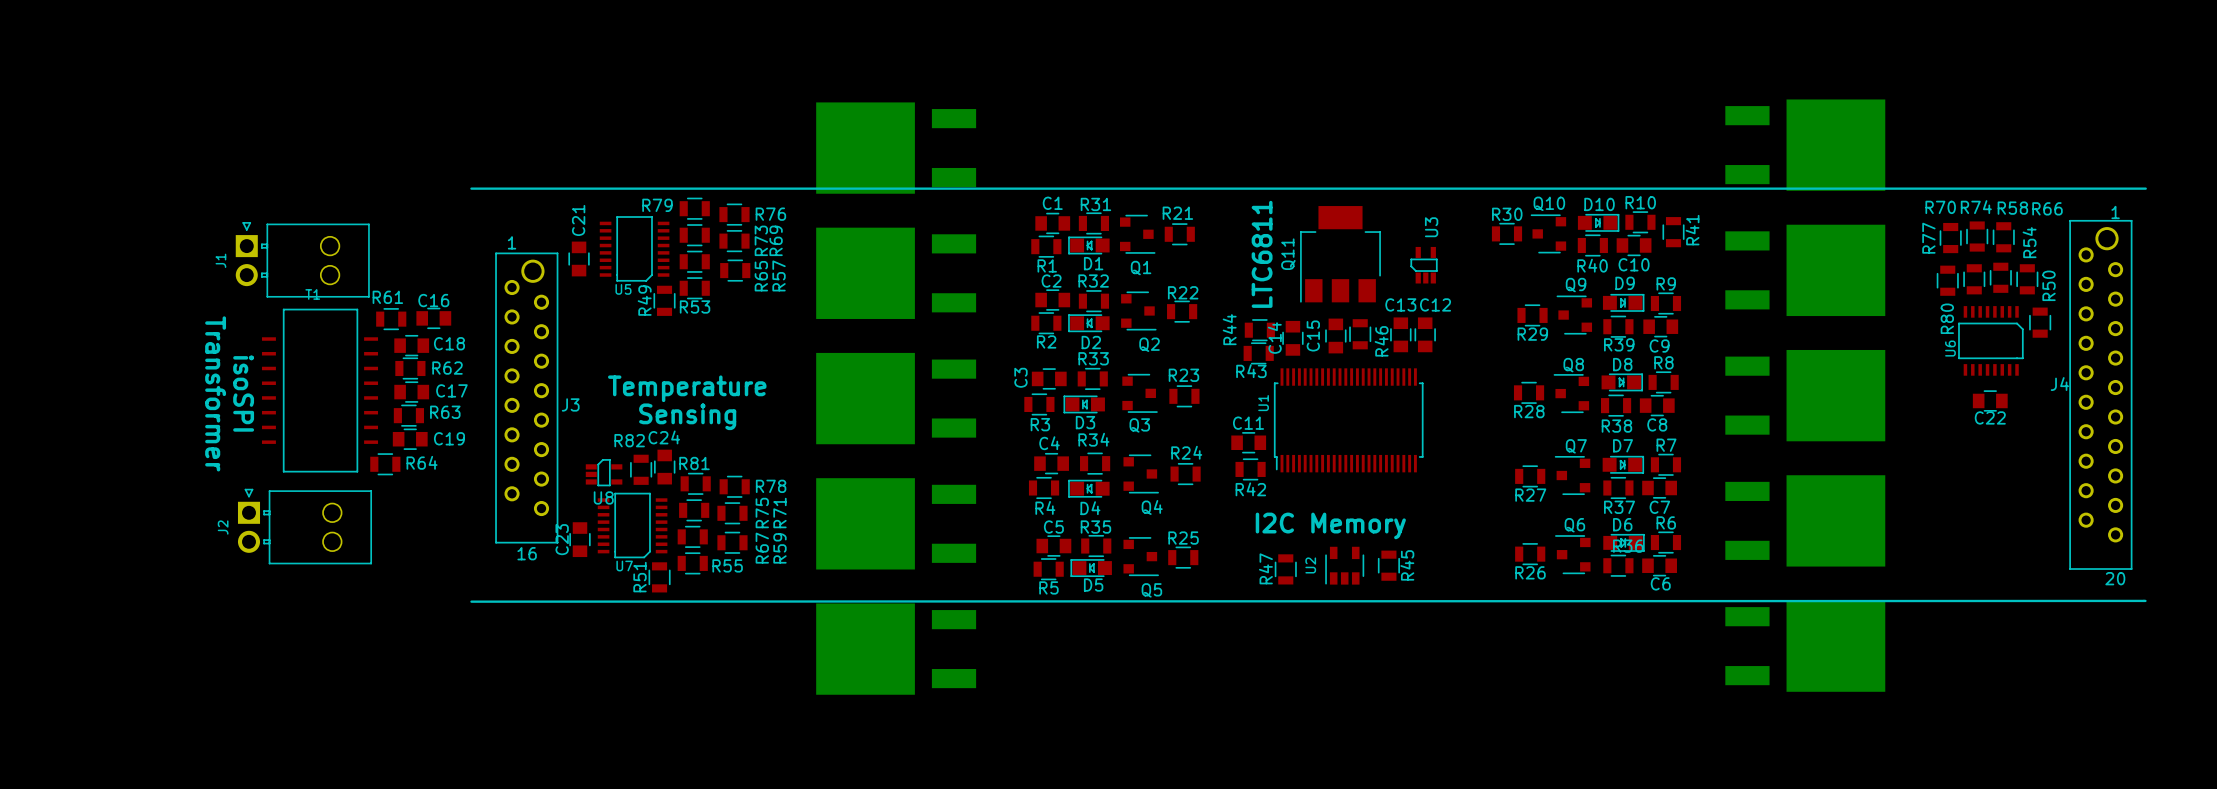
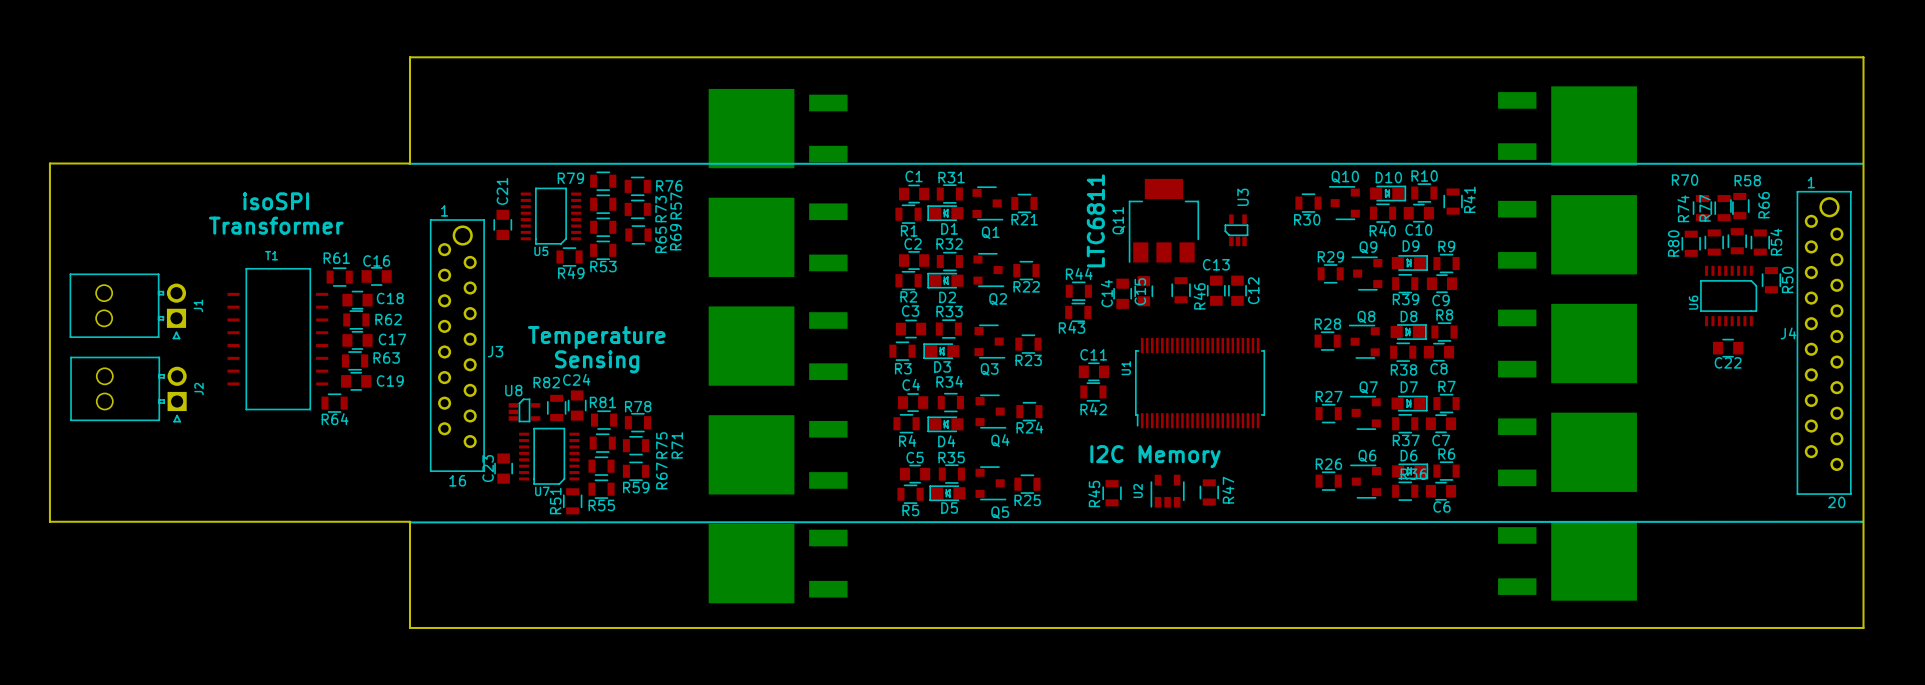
board edge: none -> (409, 57) (1863, 57) (1863, 627) (409, 627) (409, 521) (49, 521) (49, 163) (409, 163) (409, 57)
R74 name rotation: 0° (1976, 207) -> 90° counterclockwise (1683, 208)
R74 name position: R74 (1976, 207) -> R74 (1683, 208)
R66 name rotation: 0° (2047, 208) -> 90° counterclockwise (1764, 205)
J4 text position: 1 (2115, 212) -> 1 (1811, 182)
R21 name position: R21 (1177, 213) -> R21 (1024, 219)
R30 name position: R30 (1507, 214) -> R30 (1307, 219)
R70 position: (1977, 236) -> (1702, 208)
R77 position: (1950, 238) -> (1724, 208)
R69 name: R69 (776, 240) -> R57 (676, 205)
R54 name position: R54 (2029, 242) -> R54 (1776, 242)
J1 rotation: 0° (302, 259) -> 180° (127, 306)
J1 position: (302, 259) -> (127, 306)
R57 name: R57 (779, 275) -> R69 (675, 237)
R50 name position: R50 (2049, 285) -> R50 (1787, 279)
R22 name position: R22 (1183, 292) -> R22 (1026, 286)
R49 name position: R49 (644, 300) -> R49 (571, 272)
R49 rotation: 0° (664, 300) -> 90° clockwise (569, 256)
C12 name rotation: 0° (1435, 304) -> 90° counterclockwise (1253, 290)
R80 name position: R80 (1947, 318) -> R80 (1673, 243)
R44 name rotation: 0° (1229, 329) -> 90° clockwise (1079, 273)
R44 position: (1259, 330) -> (1078, 291)
R29 name position: R29 (1532, 334) -> R29 (1330, 256)
C15 position: (1335, 335) -> (1143, 291)
R43 position: (1258, 353) -> (1078, 312)
R23 name position: R23 (1183, 375) -> R23 (1028, 360)
C3 name rotation: 0° (1020, 377) -> 90° clockwise (910, 311)
C3 name position: C3 (1020, 377) -> C3 (910, 311)
text rotation: 0° (215, 393) -> 90° counterclockwise (276, 225)
text rotation: 0° (243, 393) -> 90° counterclockwise (275, 201)
text position: isoSPI (243, 393) -> isoSPI (275, 201)
R28 name position: R28 (1529, 411) -> R28 (1327, 324)
U1 position: (1348, 420) -> (1200, 383)
C11 position: (1248, 442) -> (1093, 371)
R24 name position: R24 (1186, 452) -> R24 (1029, 427)
R64 name position: R64 (422, 462) -> R64 (335, 419)
R42 position: (1250, 469) -> (1093, 391)
R78 name position: R78 (771, 486) -> R78 (638, 406)
R27 name position: R27 (1530, 495) -> R27 (1329, 396)
U8 name position: U8 (603, 497) -> U8 (513, 390)
J2 rotation: 0° (304, 526) -> 180° (128, 389)
J2 position: (304, 526) -> (128, 389)
R25 name position: R25 (1183, 538) -> R25 (1027, 500)
R59 name rotation: 0° (779, 548) -> 90° clockwise (636, 487)
R59 name position: R59 (779, 548) -> R59 (636, 487)
R55 name position: R55 (727, 565) -> R55 (601, 505)
R45 position: (1388, 565) -> (1112, 493)
R45 name position: R45 (1407, 565) -> R45 (1094, 494)
R47 name position: R47 (1265, 568) -> R47 (1228, 490)
R47 position: (1285, 569) -> (1209, 492)
R26 name position: R26 (1530, 572) -> R26 (1328, 464)

